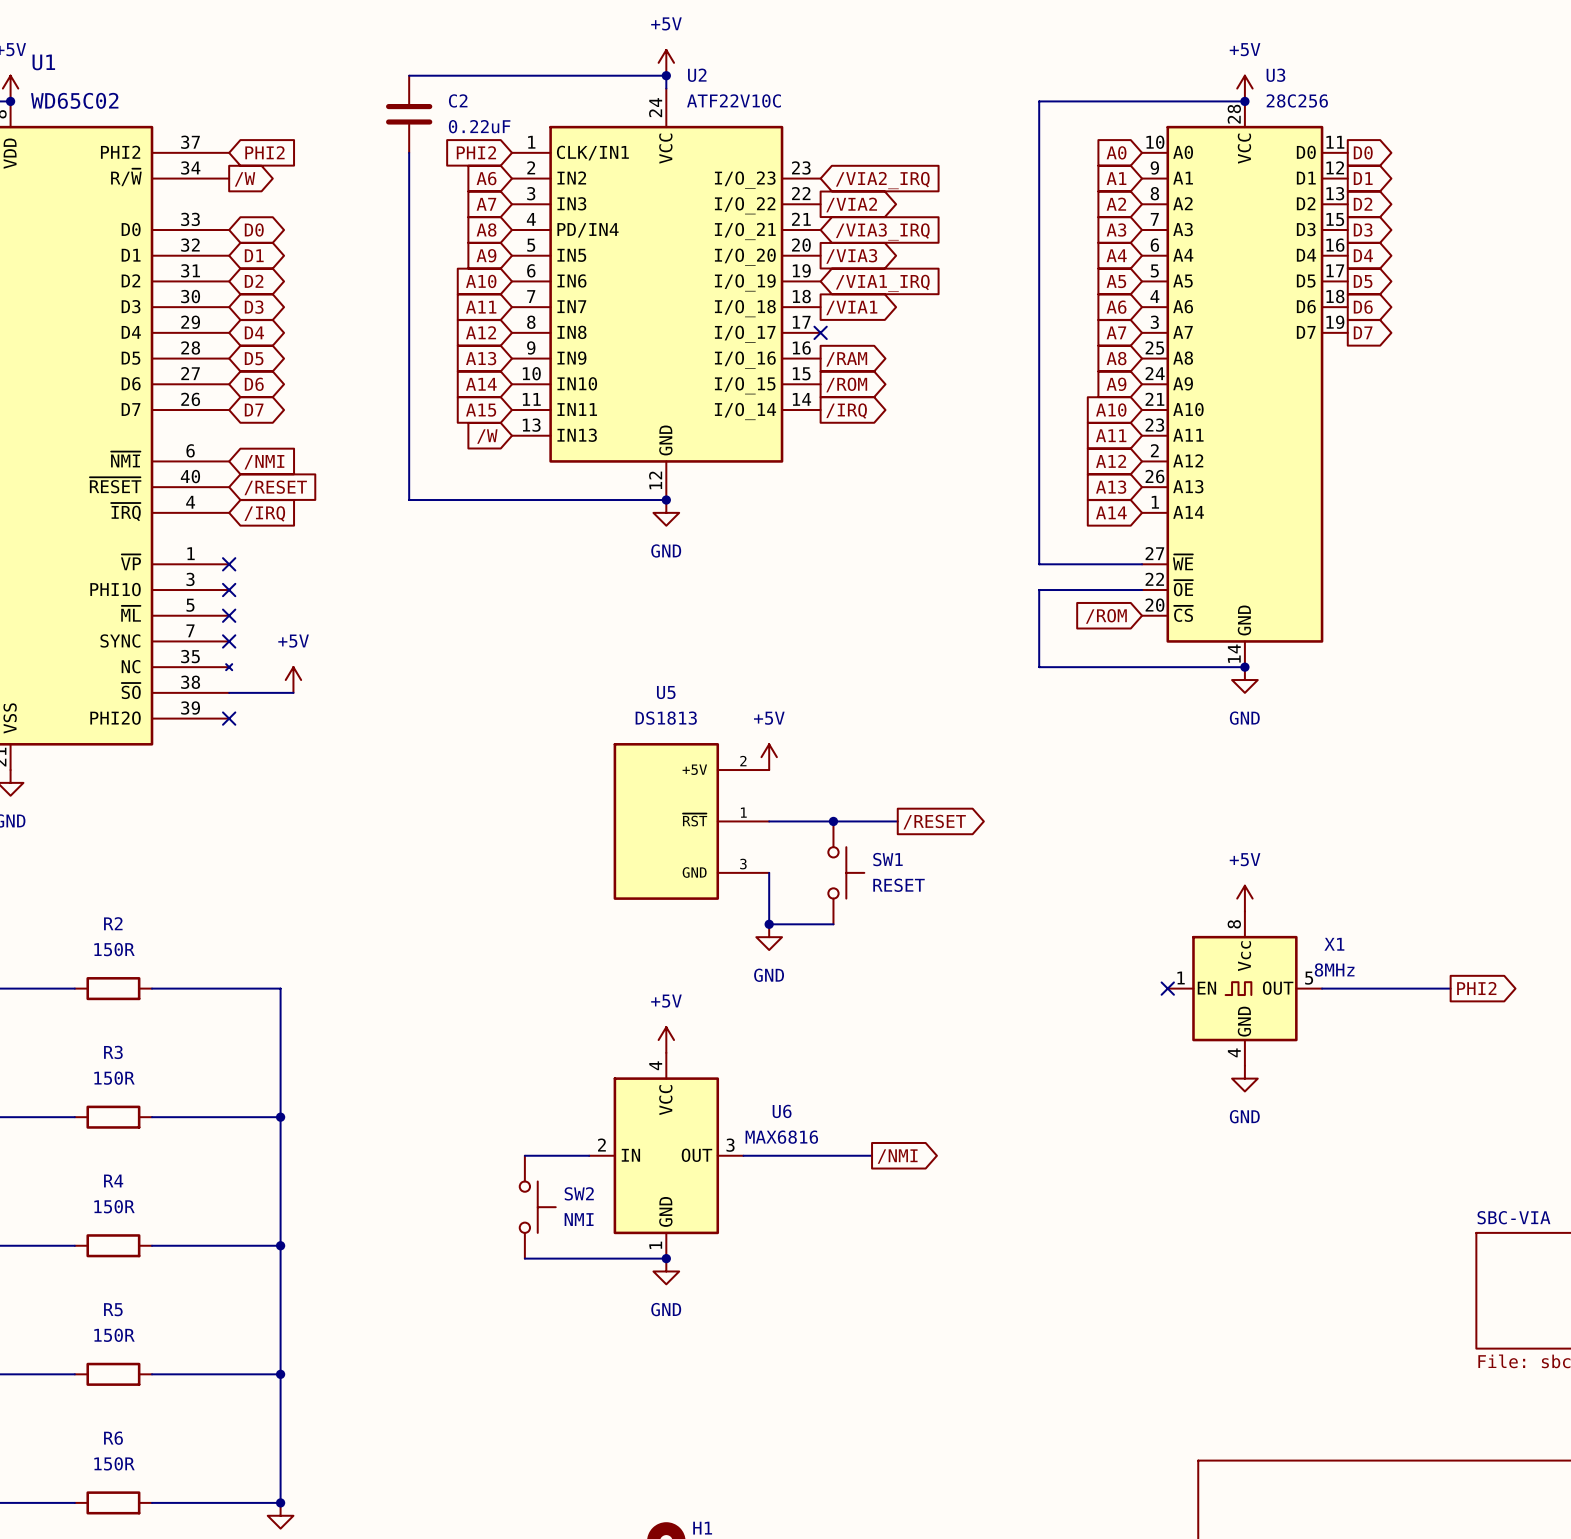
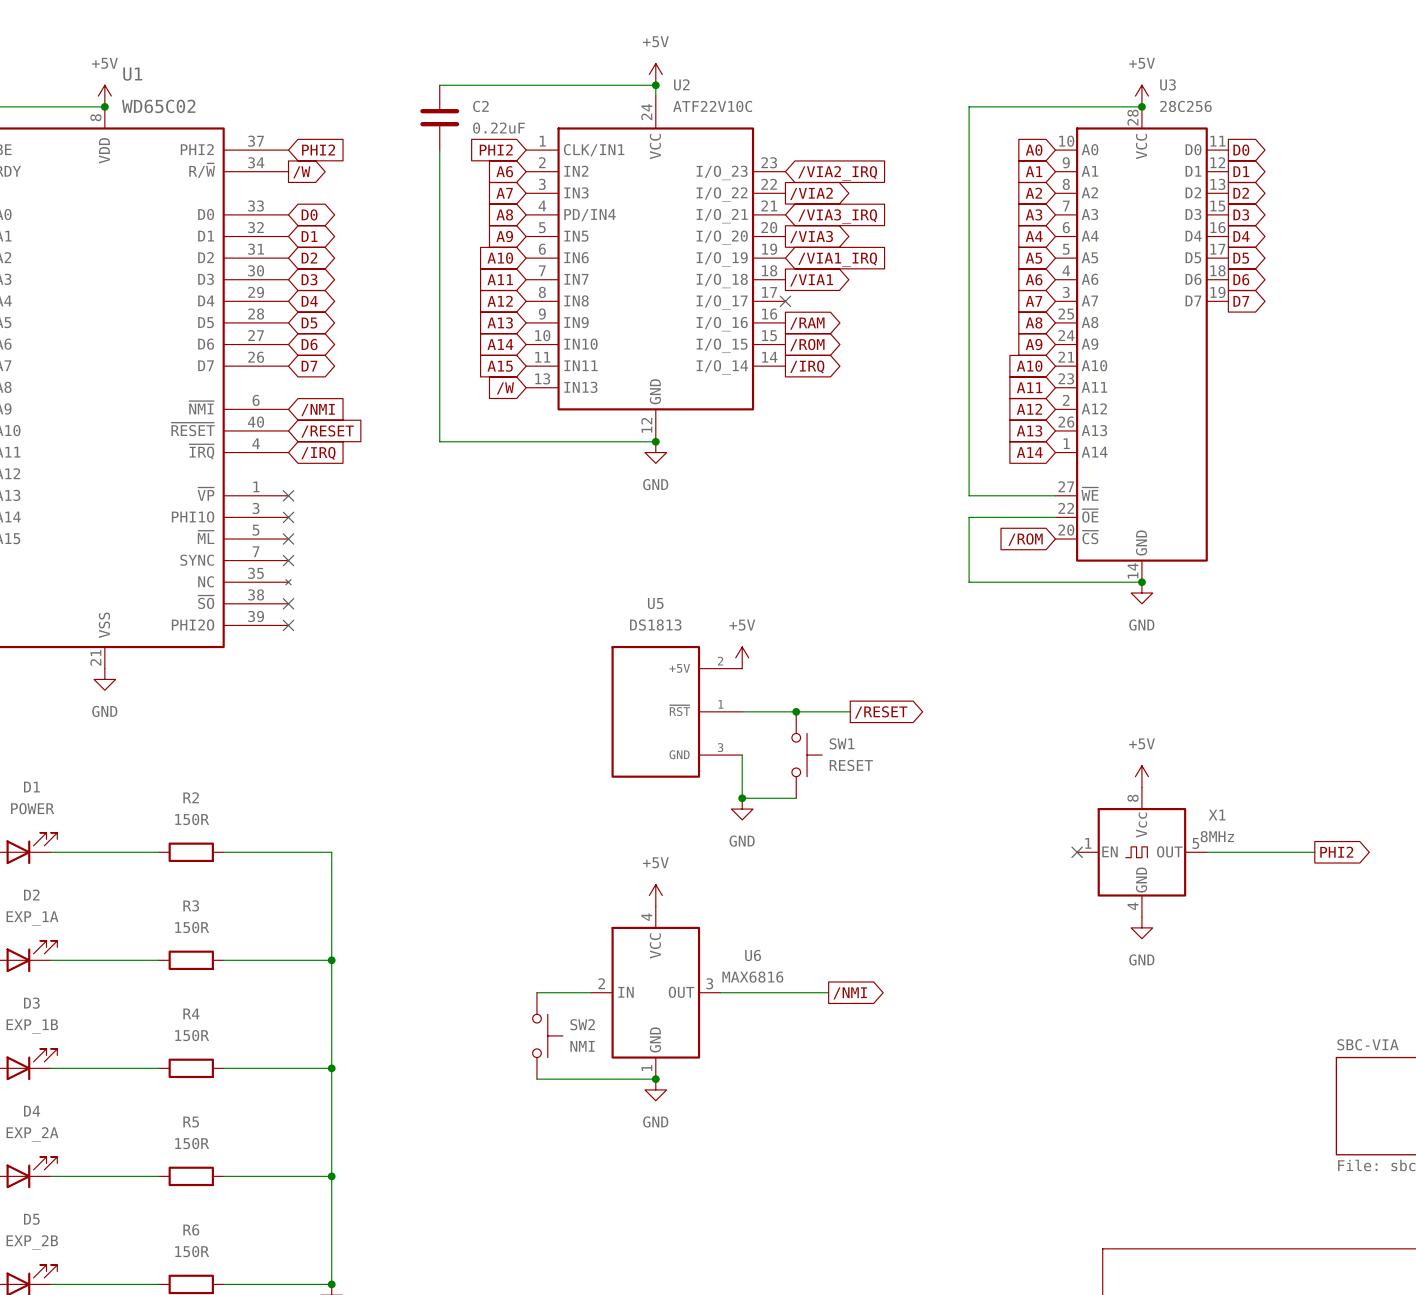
power symbol: +5V (293, 680) -> none
wire: (229, 692) (293, 692) -> none
no-connect mark: none -> (288, 603)

